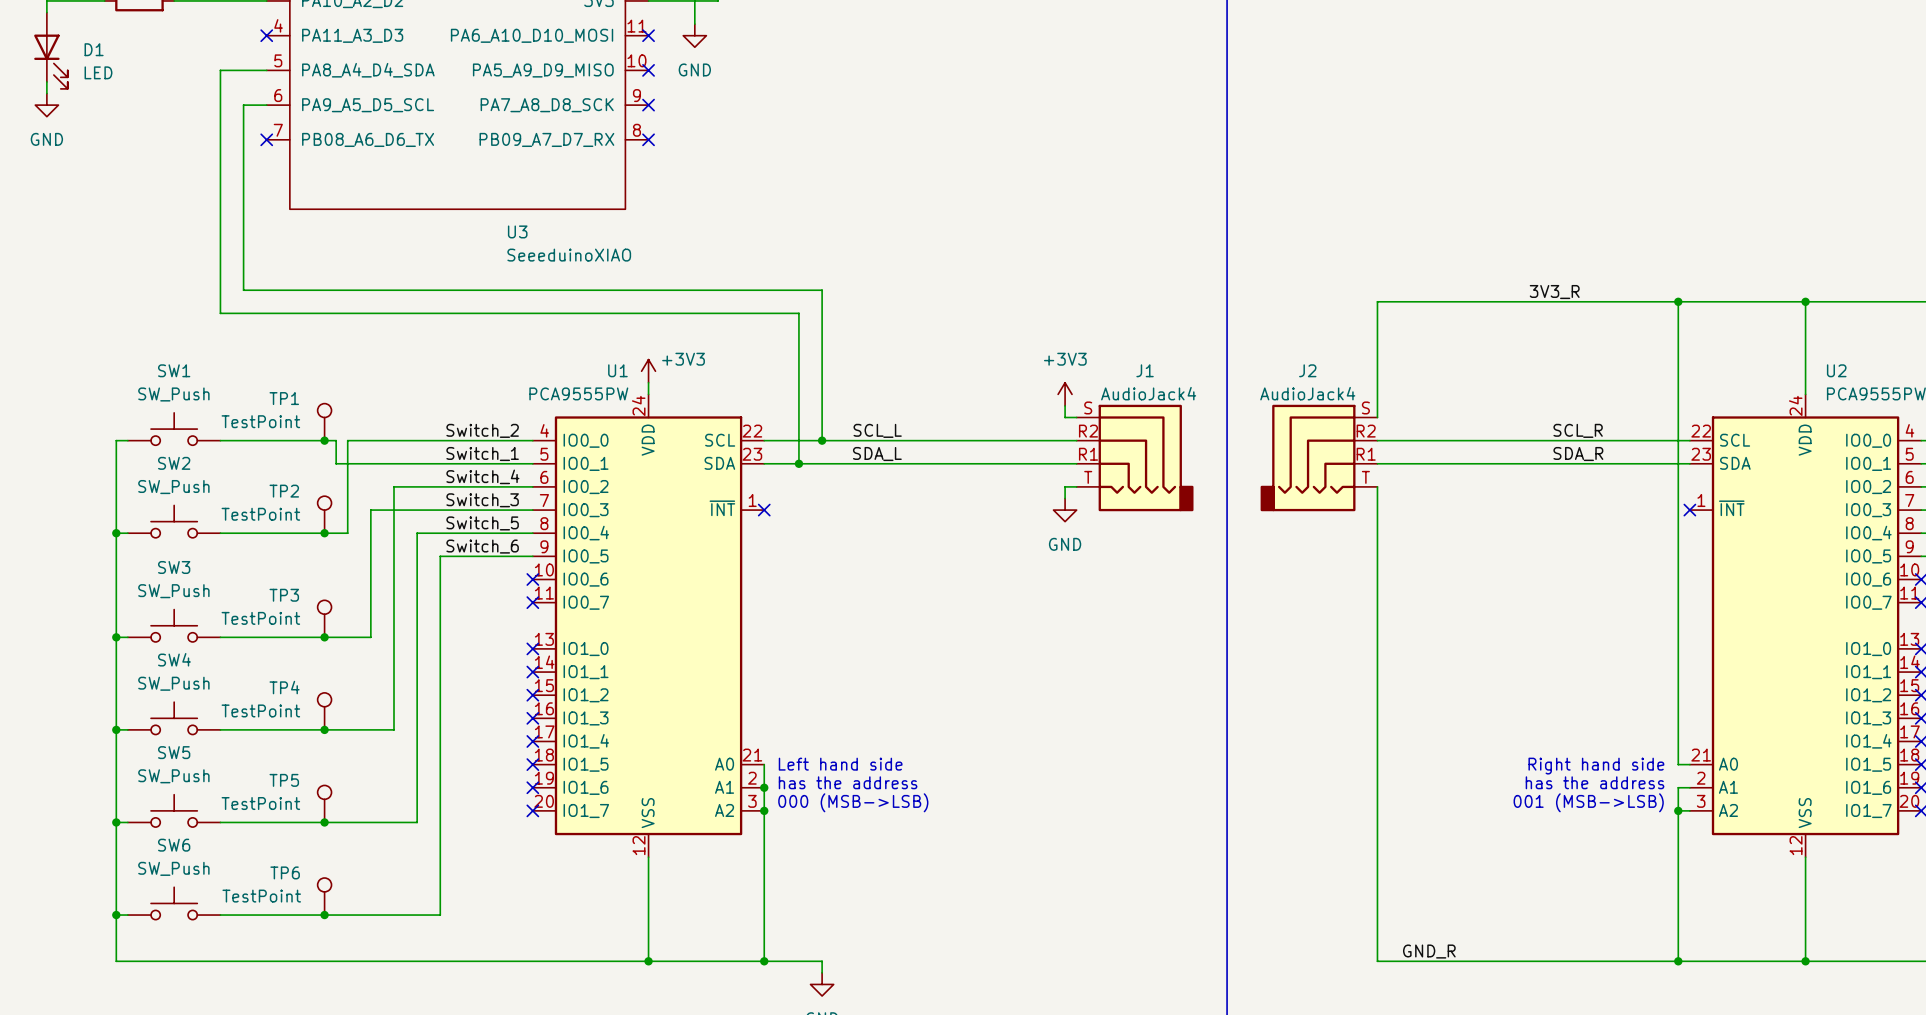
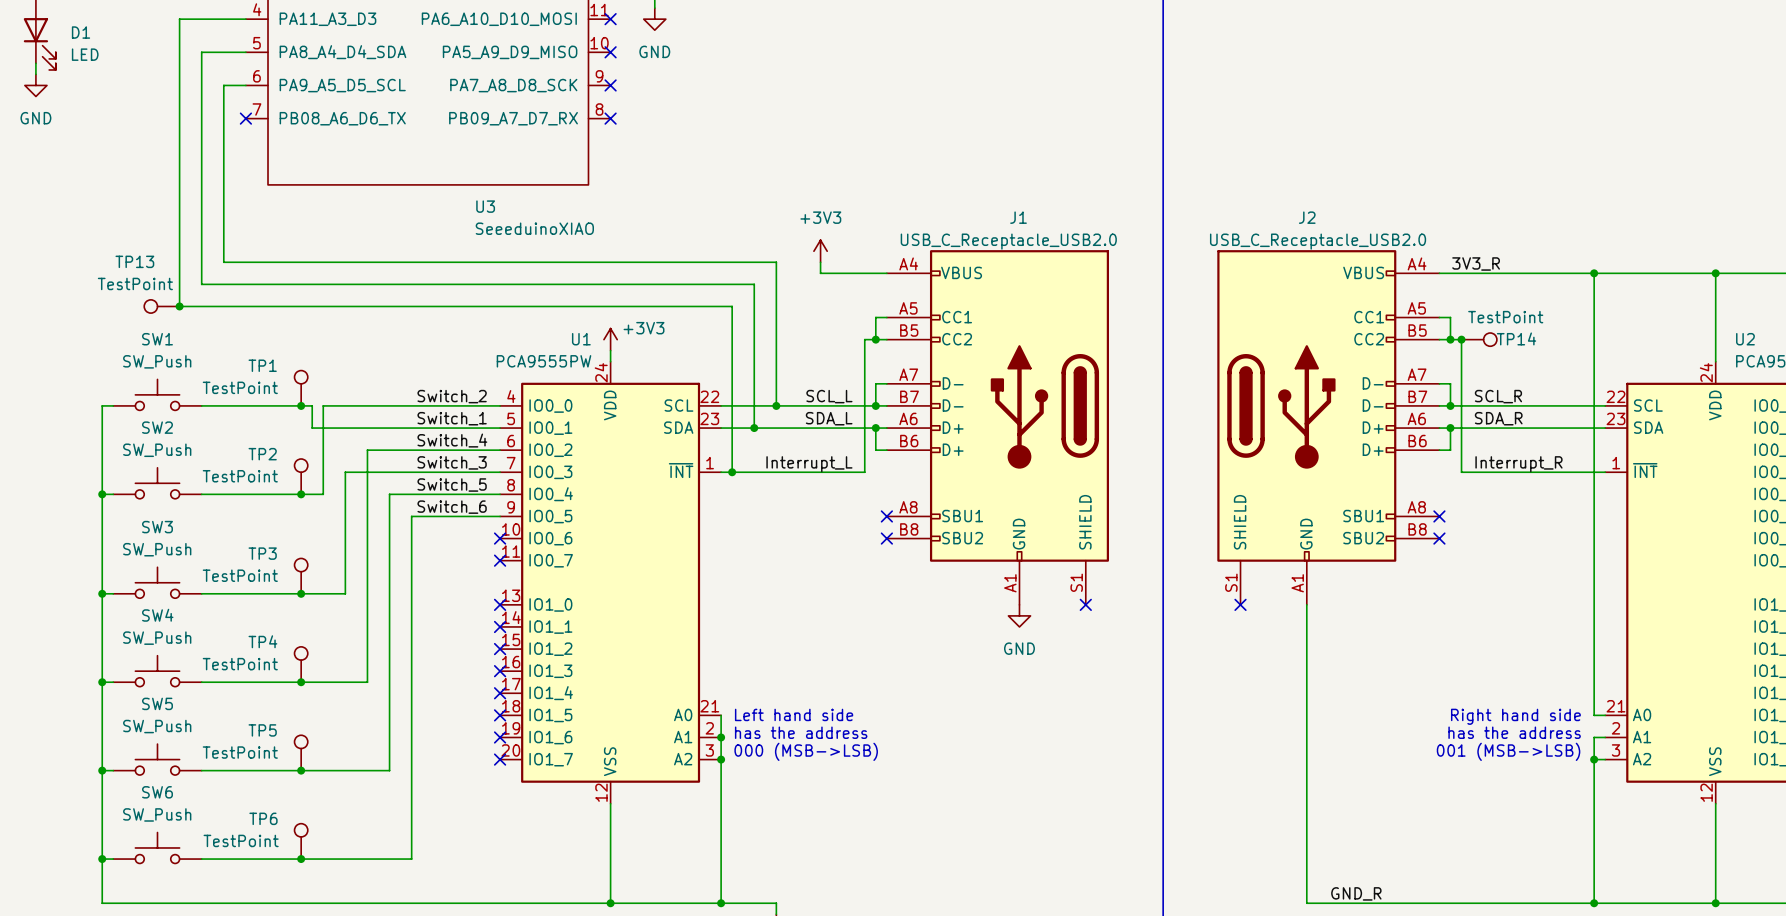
wire: none -> (245, 19) (179, 19) (179, 306) (732, 306) (732, 472)
no-connect mark: (266, 35) -> none
power symbol: none -> +3V3 (820, 251)
wire: none -> (820, 262) (820, 273) (886, 273)
TP13: none -> TestPoint (161, 306)
junction: none -> (179, 306)
wire: none -> (886, 317) (875, 317) (875, 339)
wire: none -> (1439, 317) (1450, 317) (1450, 339)
J1 name position: J1 (1145, 370) -> J1 (1018, 217)
J2 name position: J2 (1307, 370) -> J2 (1307, 217)
junction: none -> (875, 339)
wire: none -> (886, 339) (864, 339) (864, 472) (721, 472)
wire: none -> (1439, 339) (1461, 339) (1461, 472) (1605, 472)
junction: none -> (1450, 339)
junction: none -> (1461, 339)
TP14: none -> TestPoint (1479, 339)
J1 value: AudioJack4 (1148, 393) -> USB_C_Receptacle_USB2.0 (1008, 241)
J2 value: AudioJack4 (1307, 393) -> USB_C_Receptacle_USB2.0 (1318, 241)
power symbol: +3V3 (1065, 394) -> none
J1 symbol: [1076, 404, 1194, 512] -> [886, 250, 1109, 605]
J2 symbol: [1260, 404, 1378, 512] -> [1217, 250, 1440, 605]
wire: none -> (886, 383) (875, 383) (875, 405)
wire: none -> (1439, 383) (1450, 383) (1450, 405)
junction: none -> (875, 405)
junction: none -> (1450, 405)
wire: none -> (875, 428) (875, 450) (886, 450)
junction: none -> (875, 428)
wire: none -> (1450, 428) (1450, 450) (1439, 450)
junction: none -> (1450, 428)
label: none -> Interrupt_L (809, 464)
label: none -> Interrupt_R (1518, 464)
no-connect mark: (764, 510) -> none
junction: none -> (732, 472)
power symbol position: GND (1065, 510) -> GND (1019, 615)
no-connect mark: (1689, 510) -> none
no-connect mark: none -> (886, 516)
no-connect mark: none -> (1439, 516)
no-connect mark: none -> (886, 538)
no-connect mark: none -> (1439, 538)
no-connect mark: none -> (1085, 604)
no-connect mark: none -> (1240, 604)

